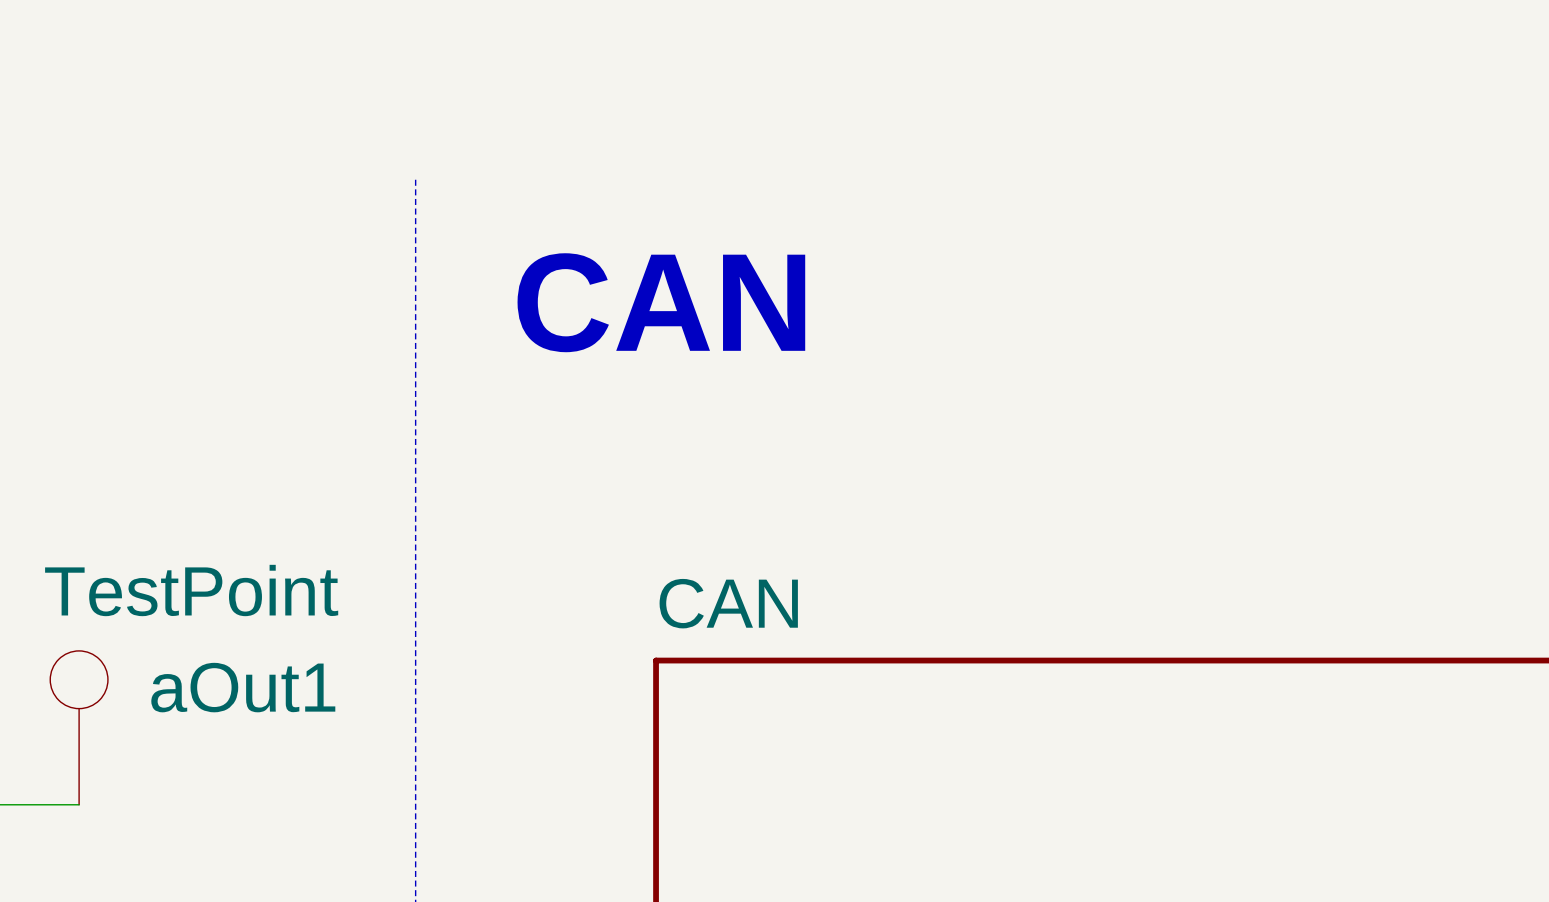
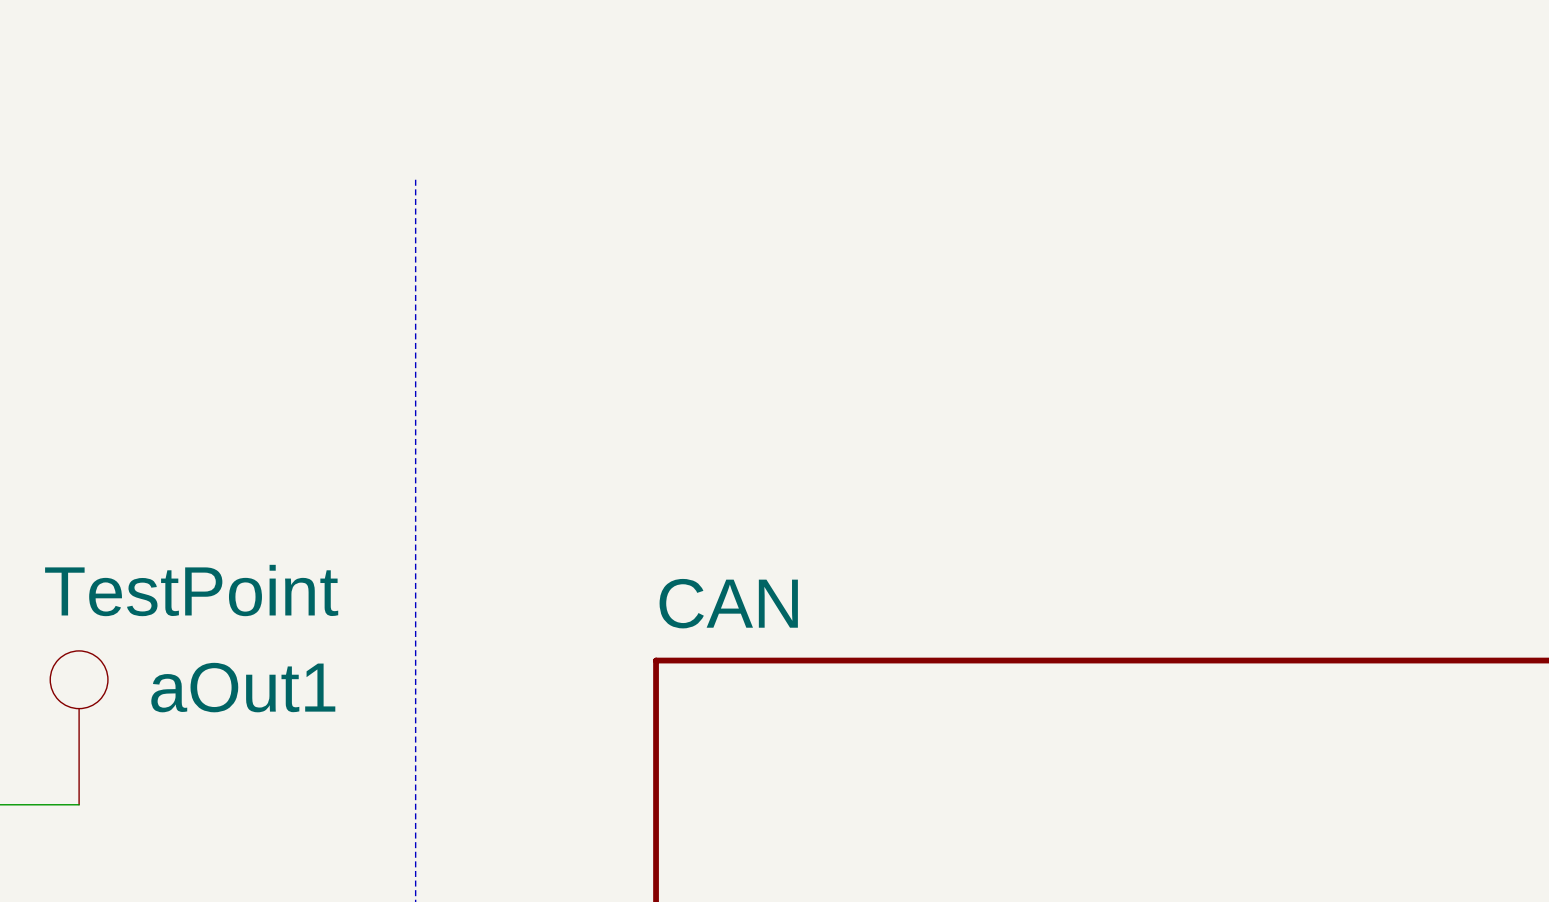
text: CAN (661, 302) -> none

